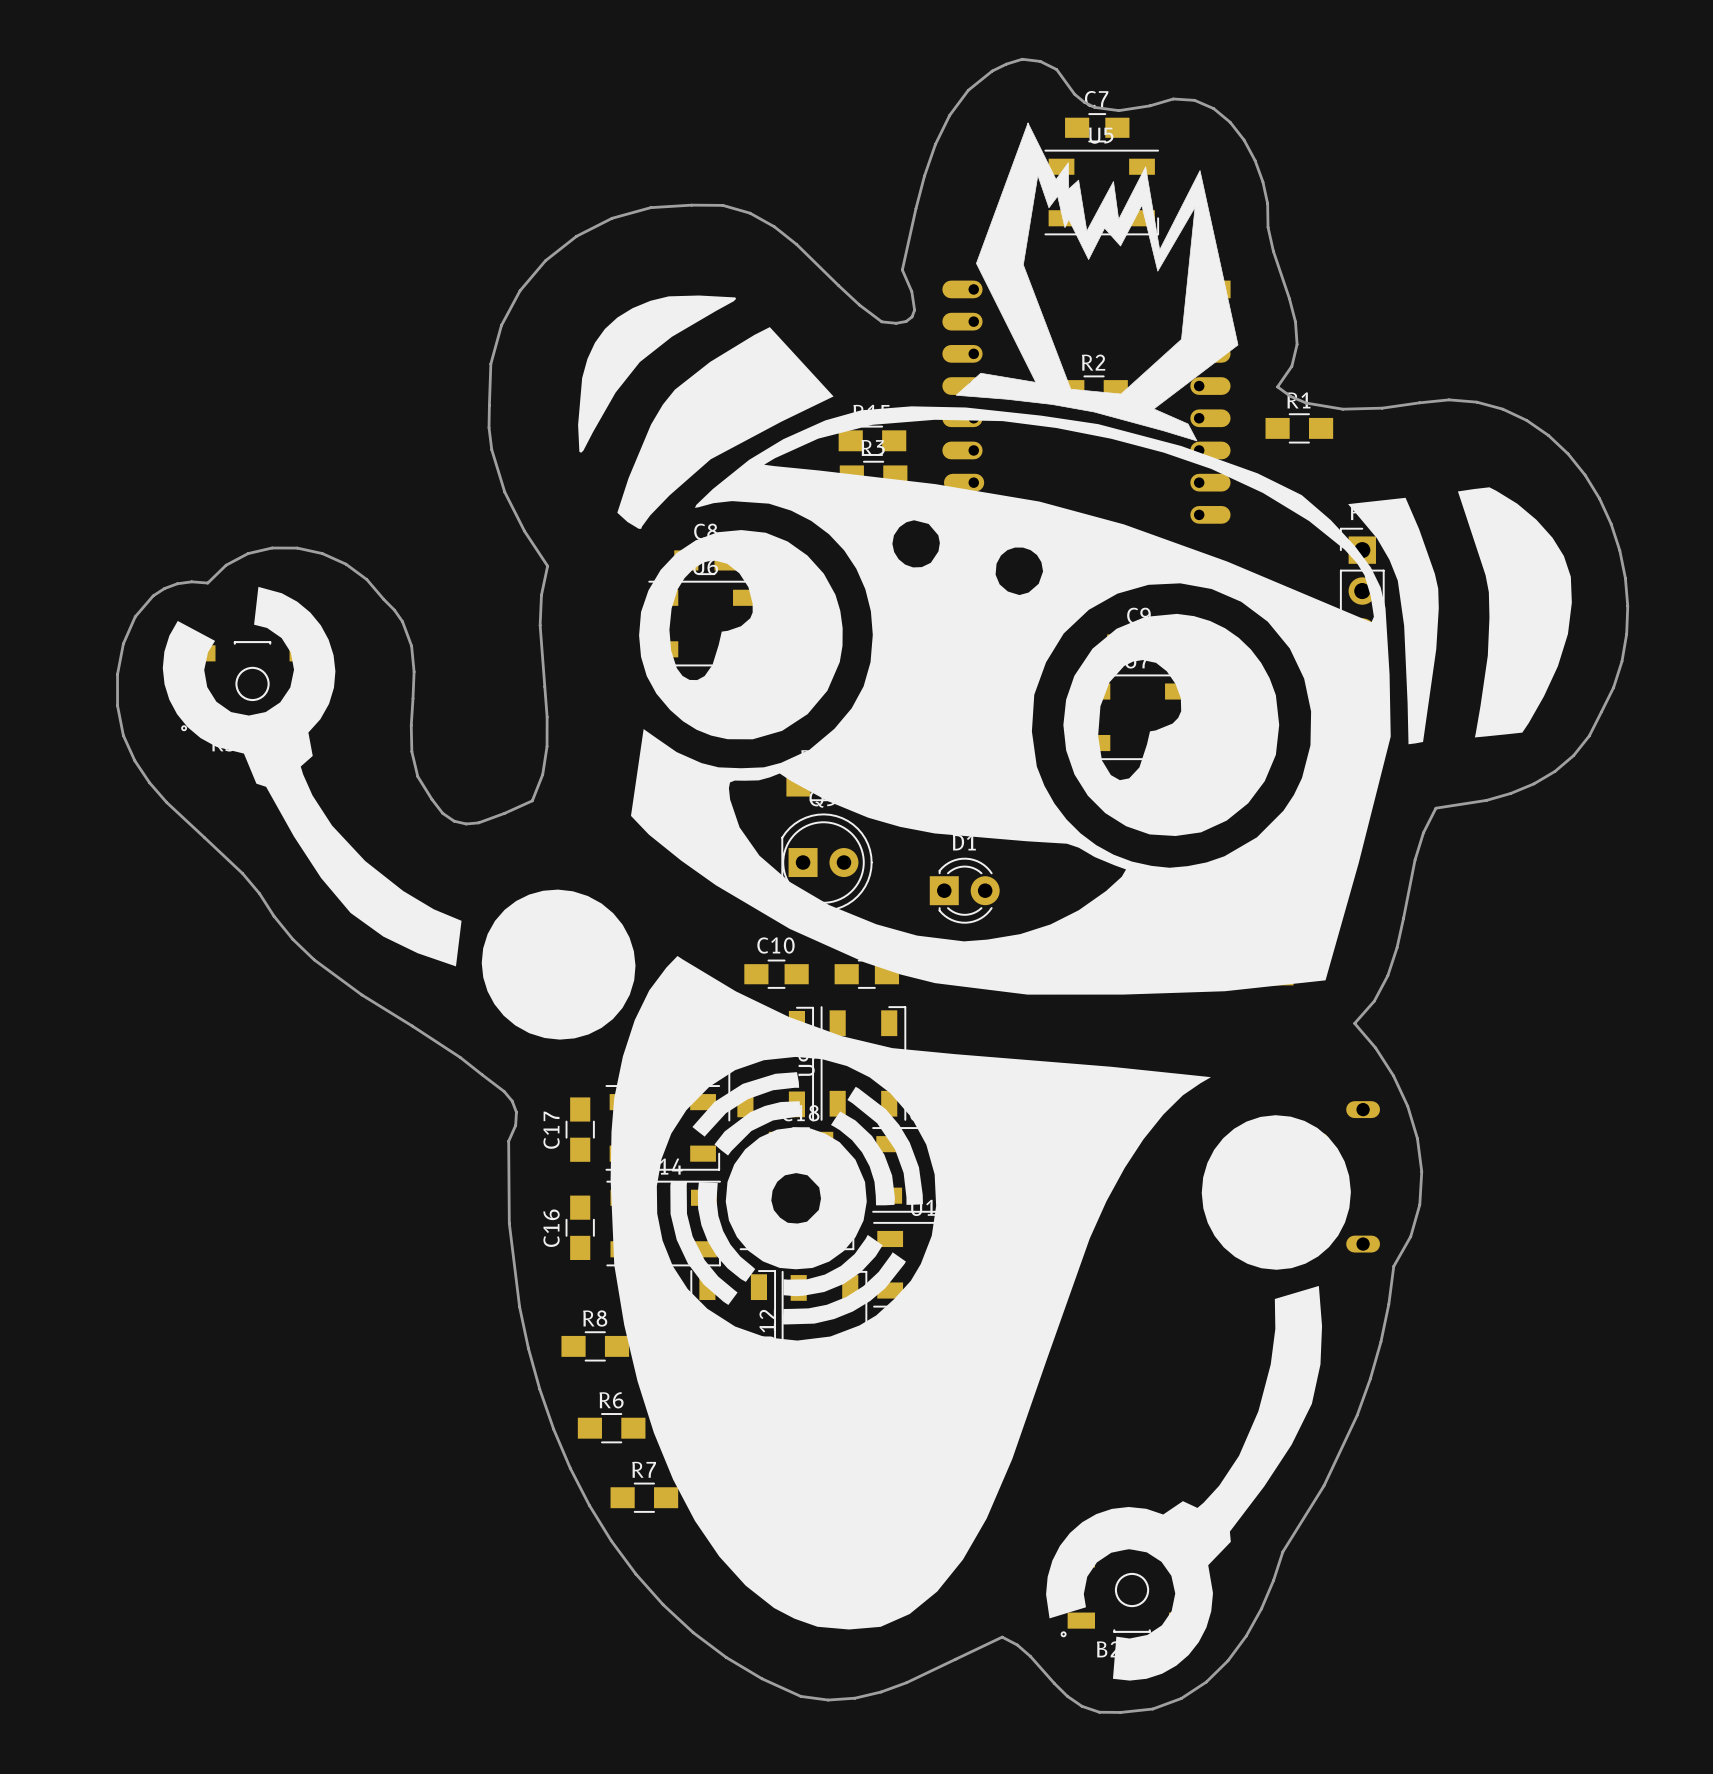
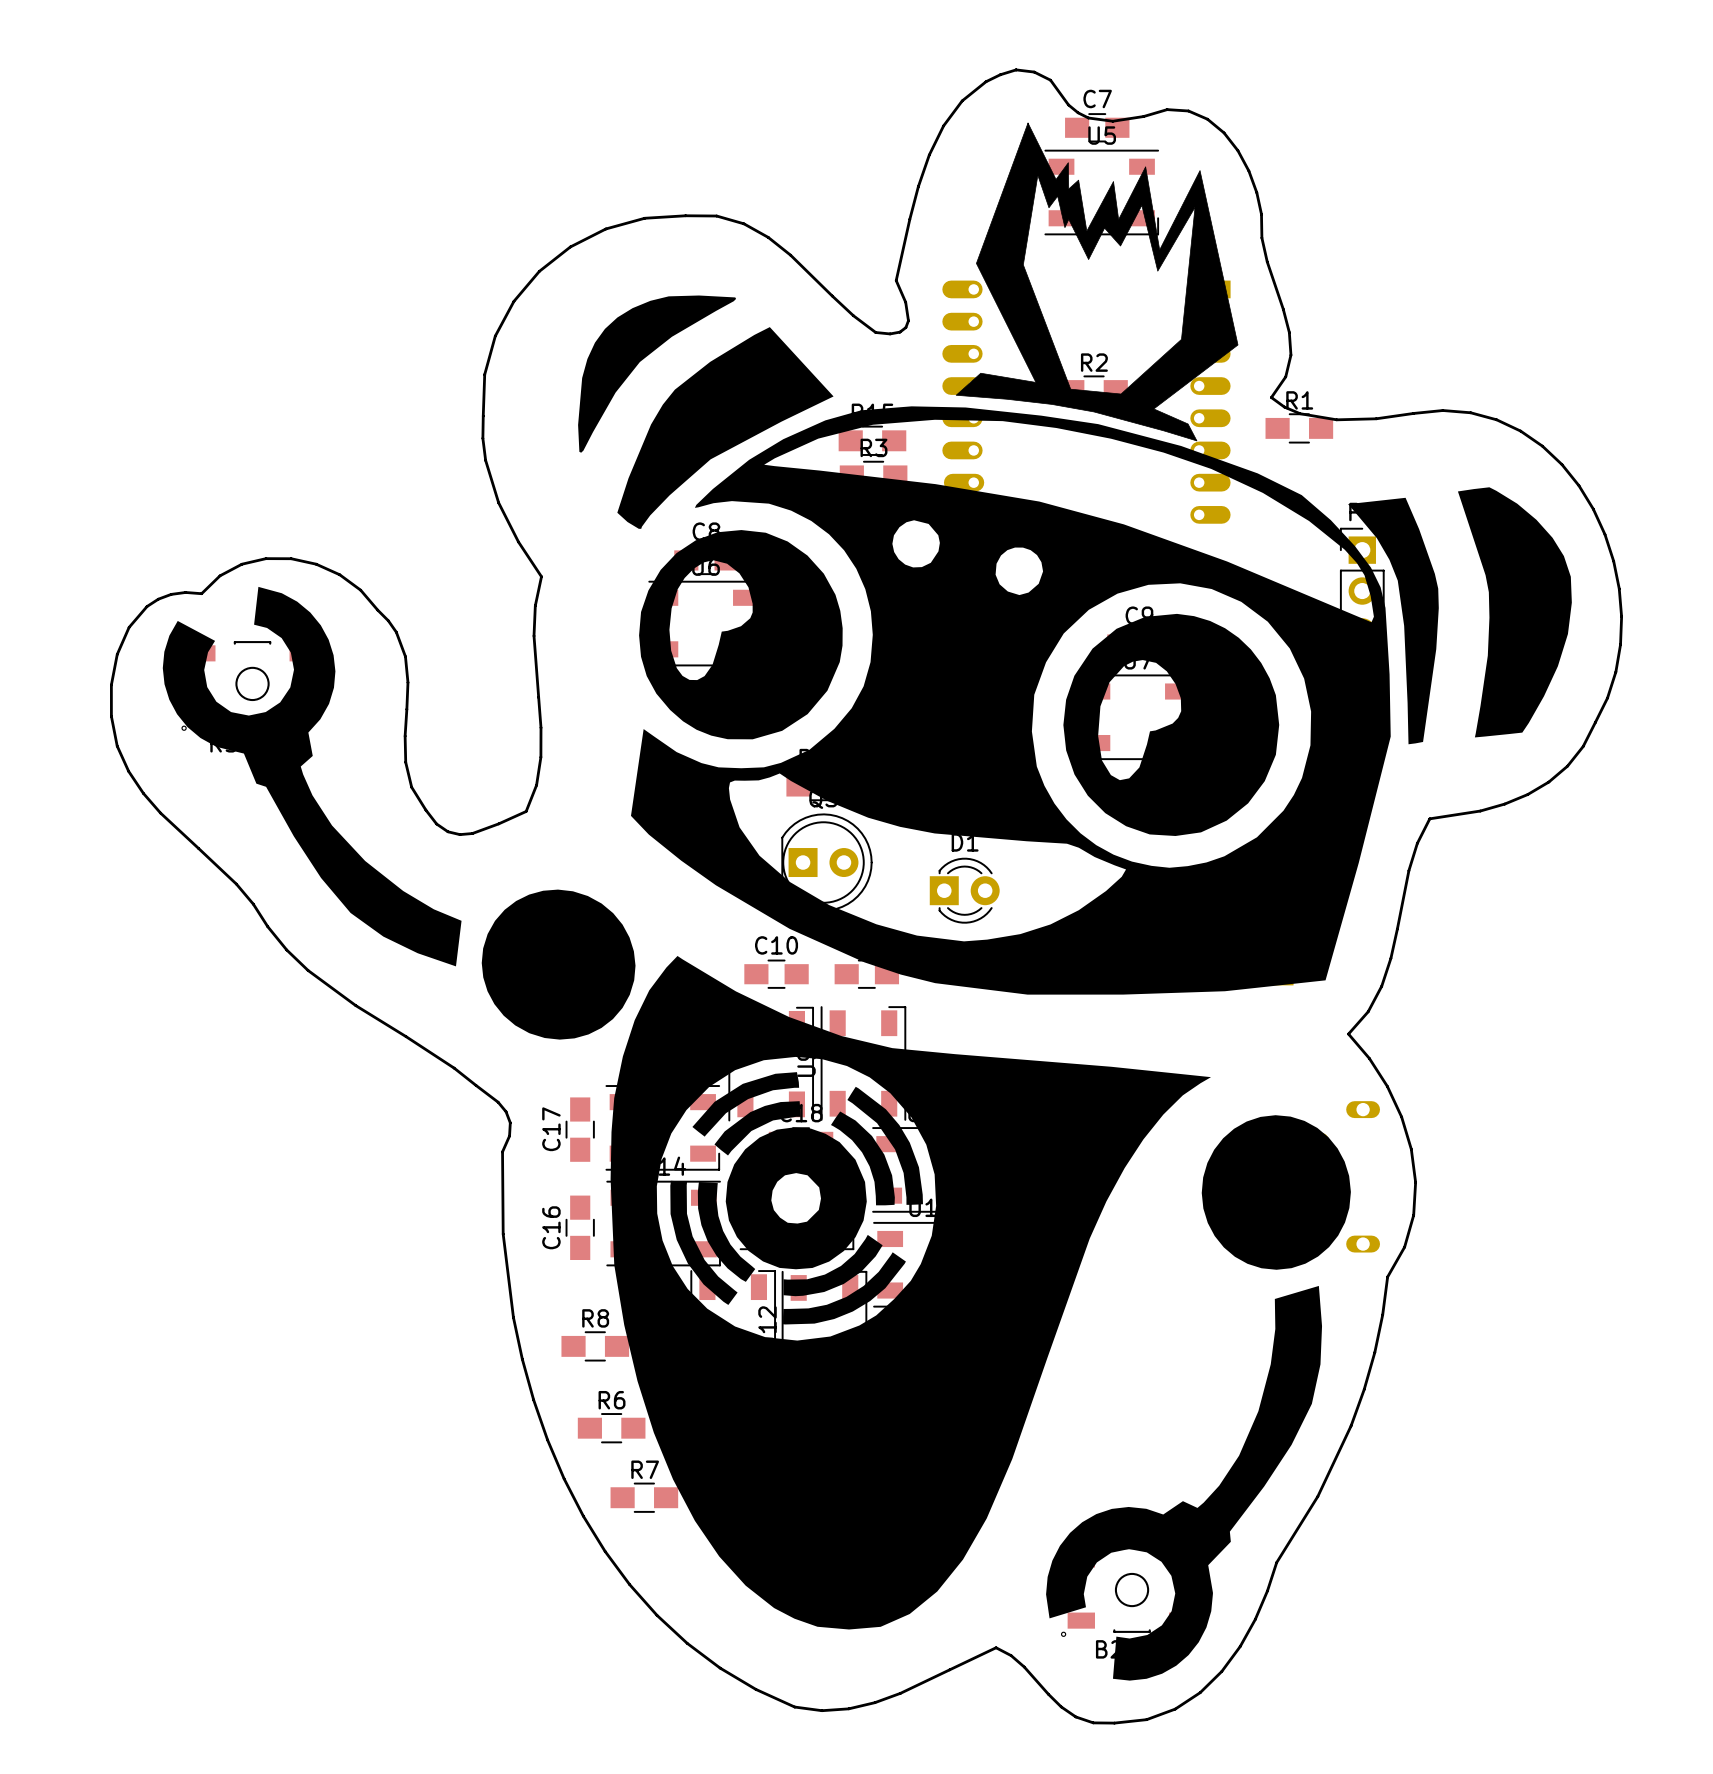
drawing position: (872, 885) -> (866, 896)

